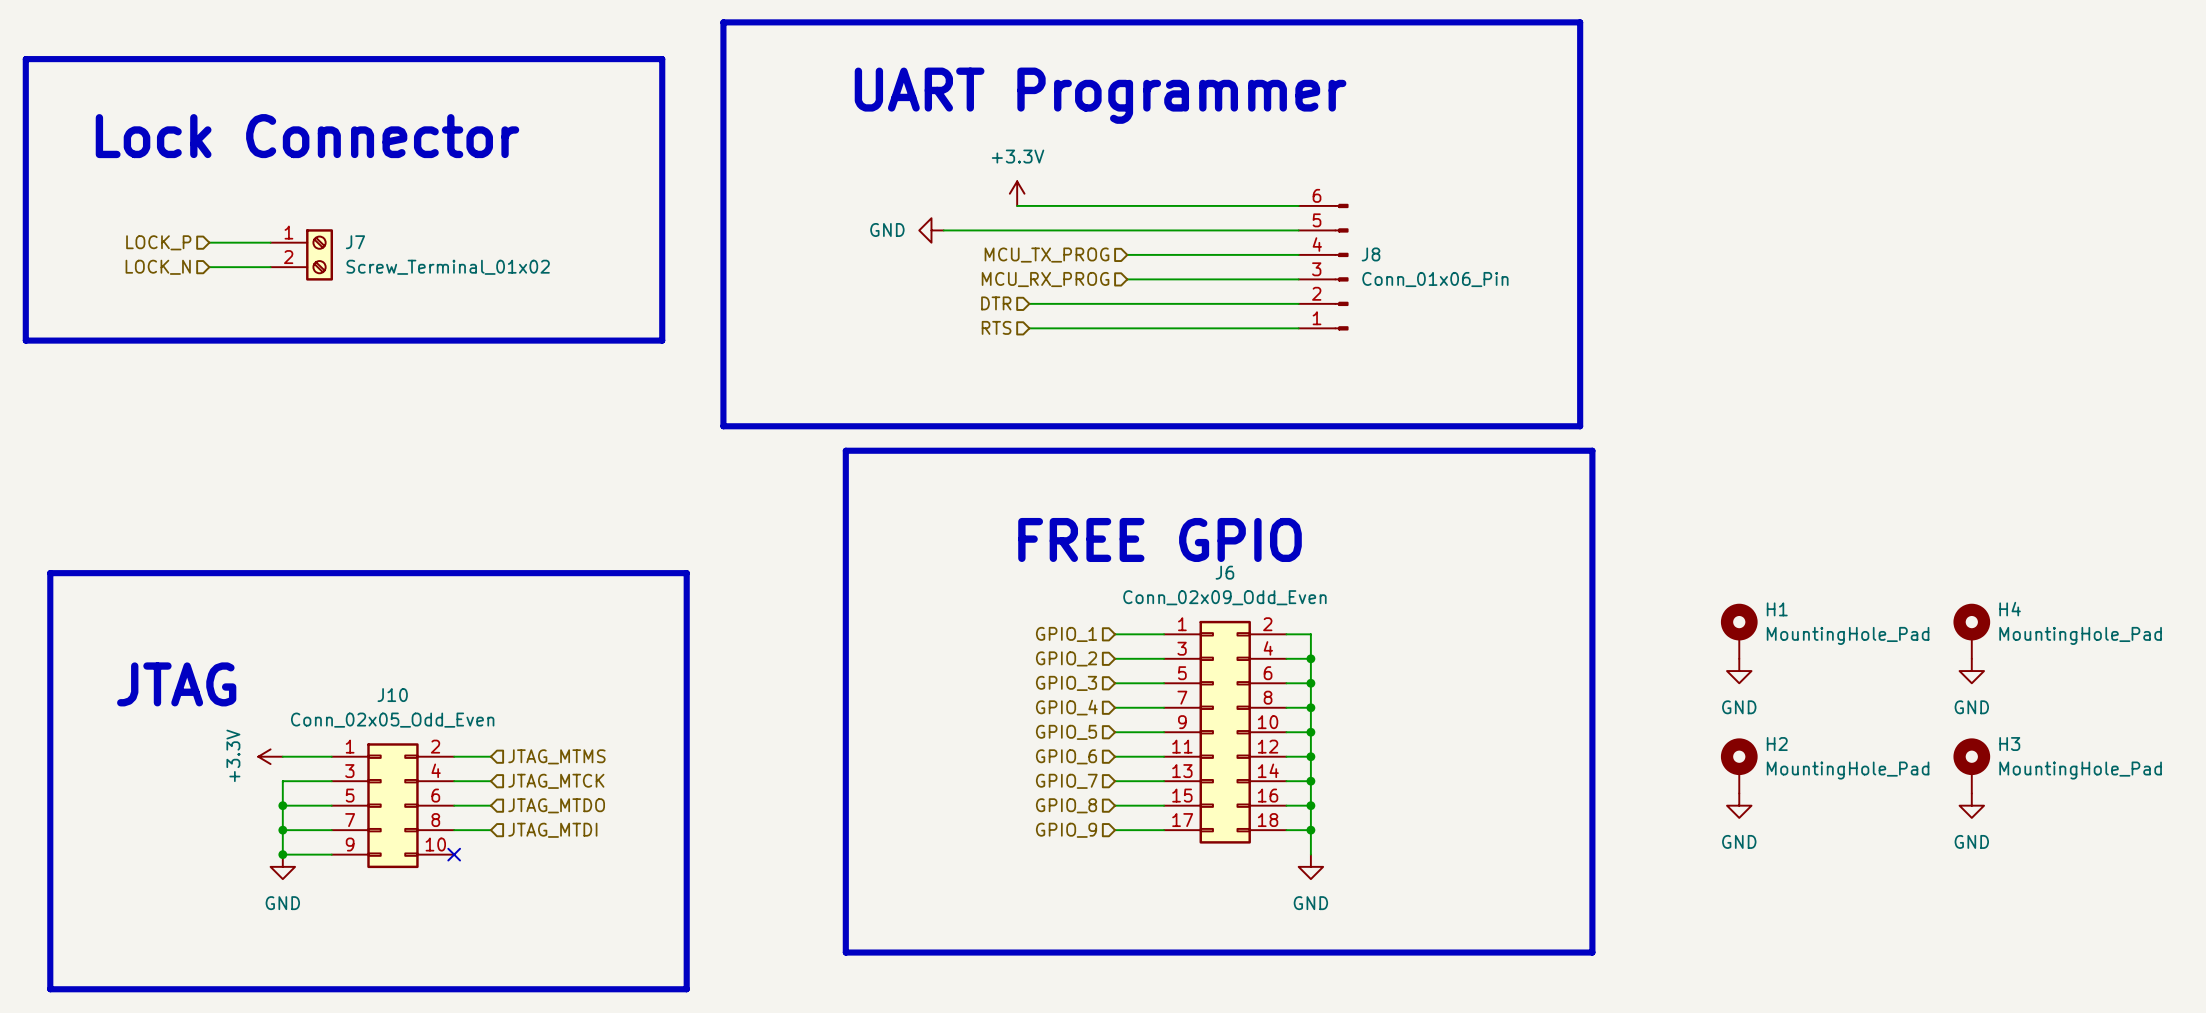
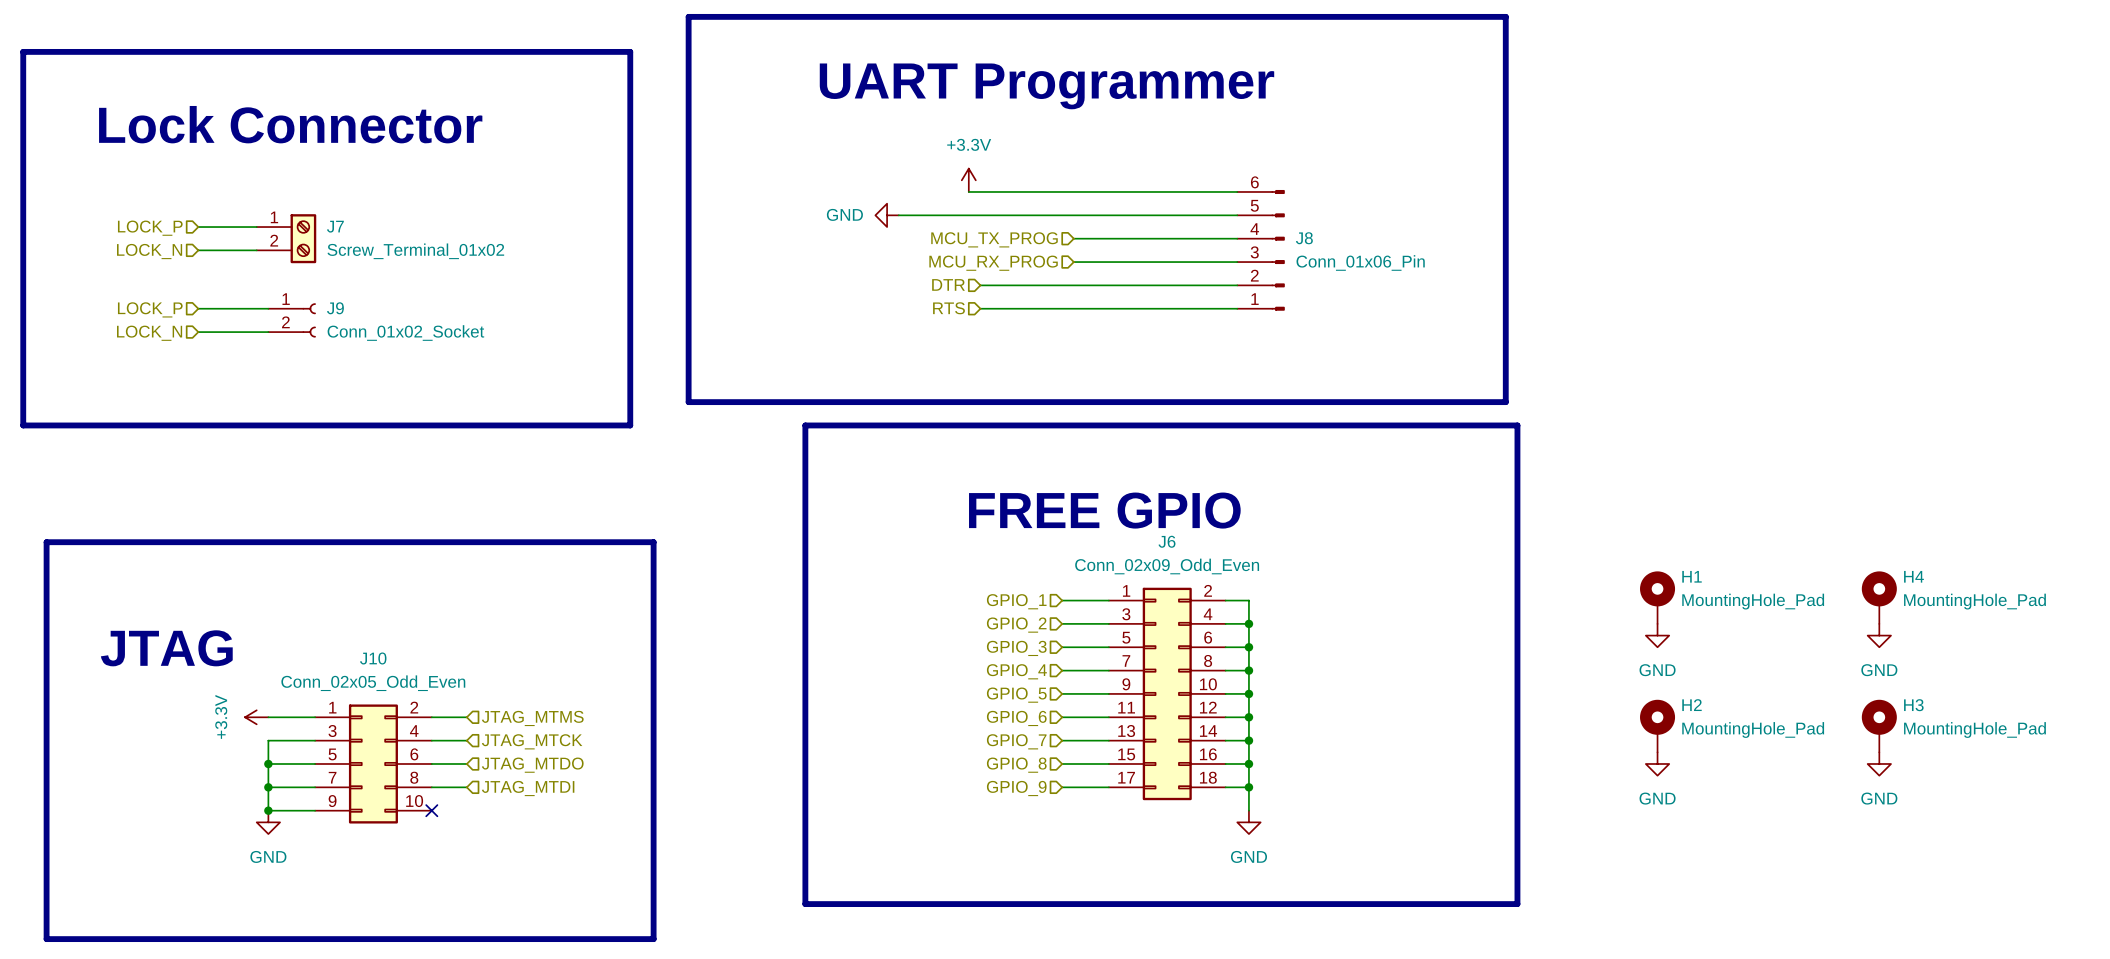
hierarchical label: none -> LOCK_P (150, 309)
wire: none -> (198, 308) (268, 308)
line: (25, 340) (662, 340) -> (23, 320) (23, 425) (630, 425) (630, 320)
J9: none -> Conn_01x02_Socket (292, 320)
hierarchical label: none -> LOCK_N (149, 333)
wire: none -> (198, 332) (268, 332)

